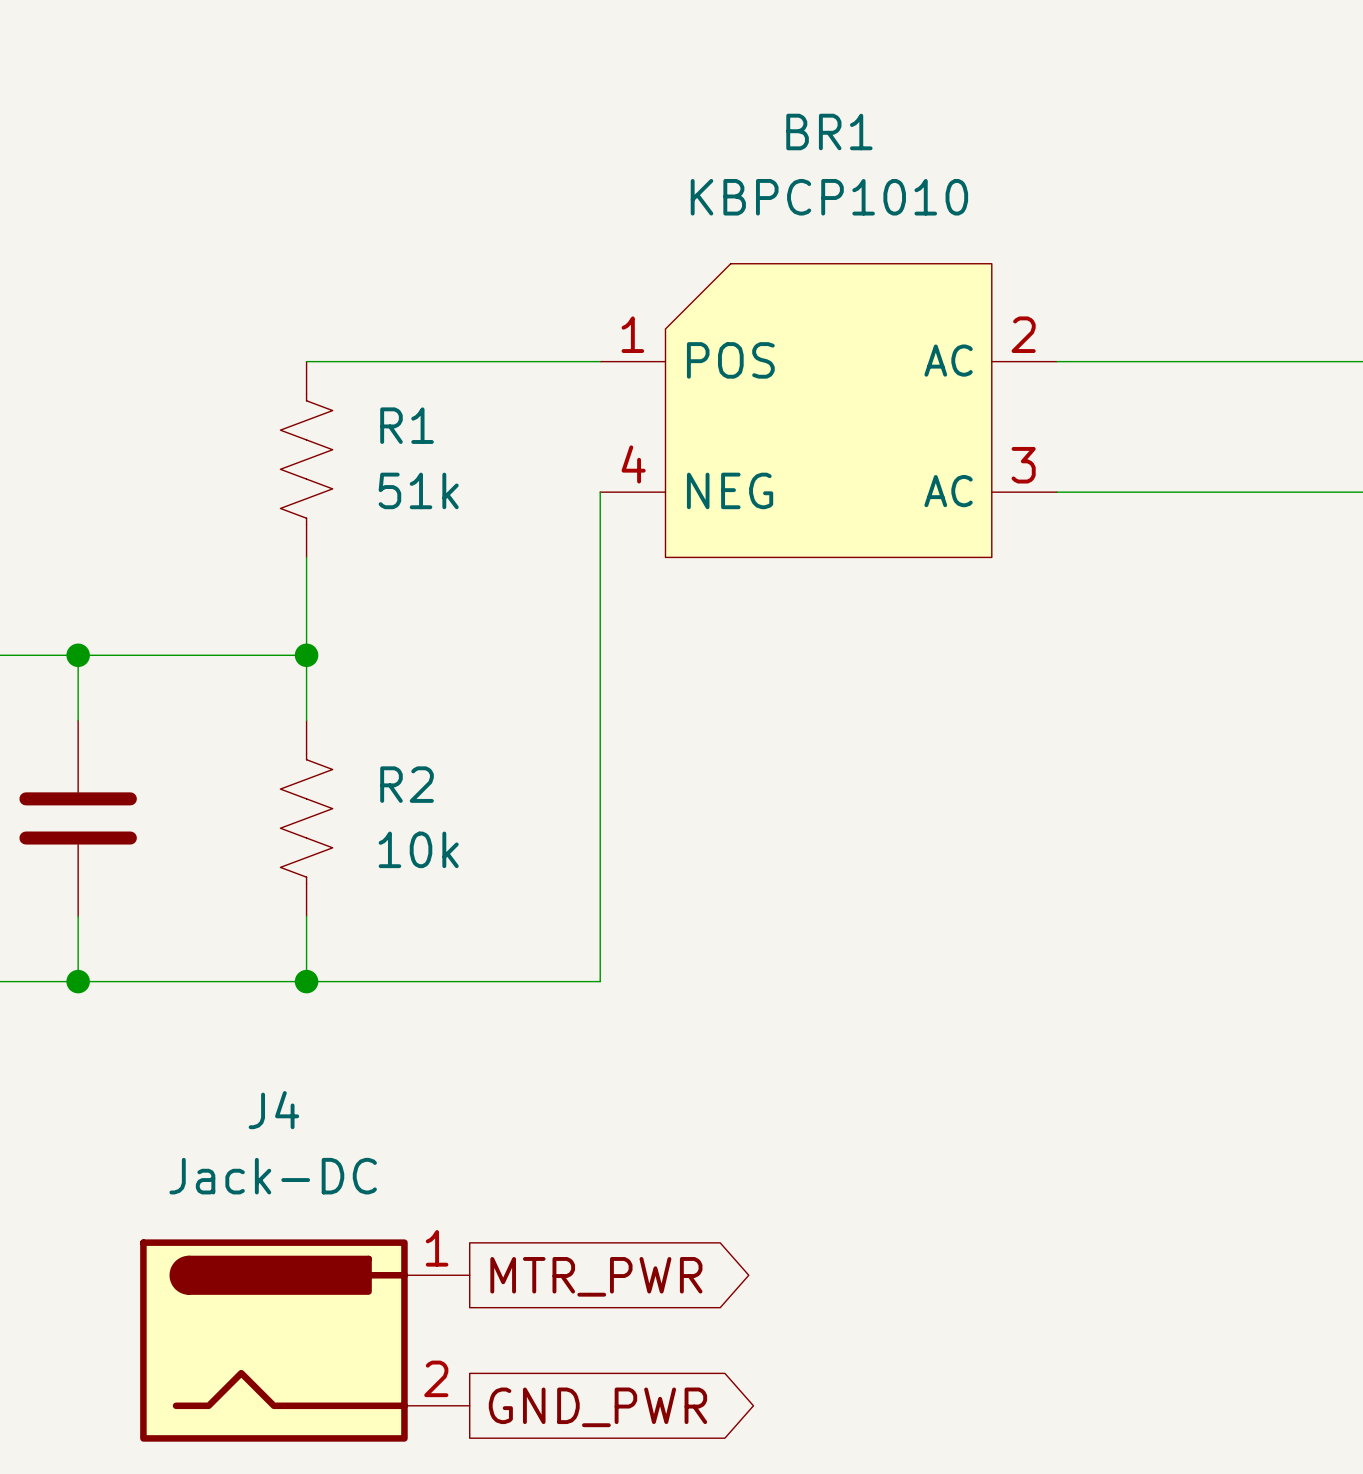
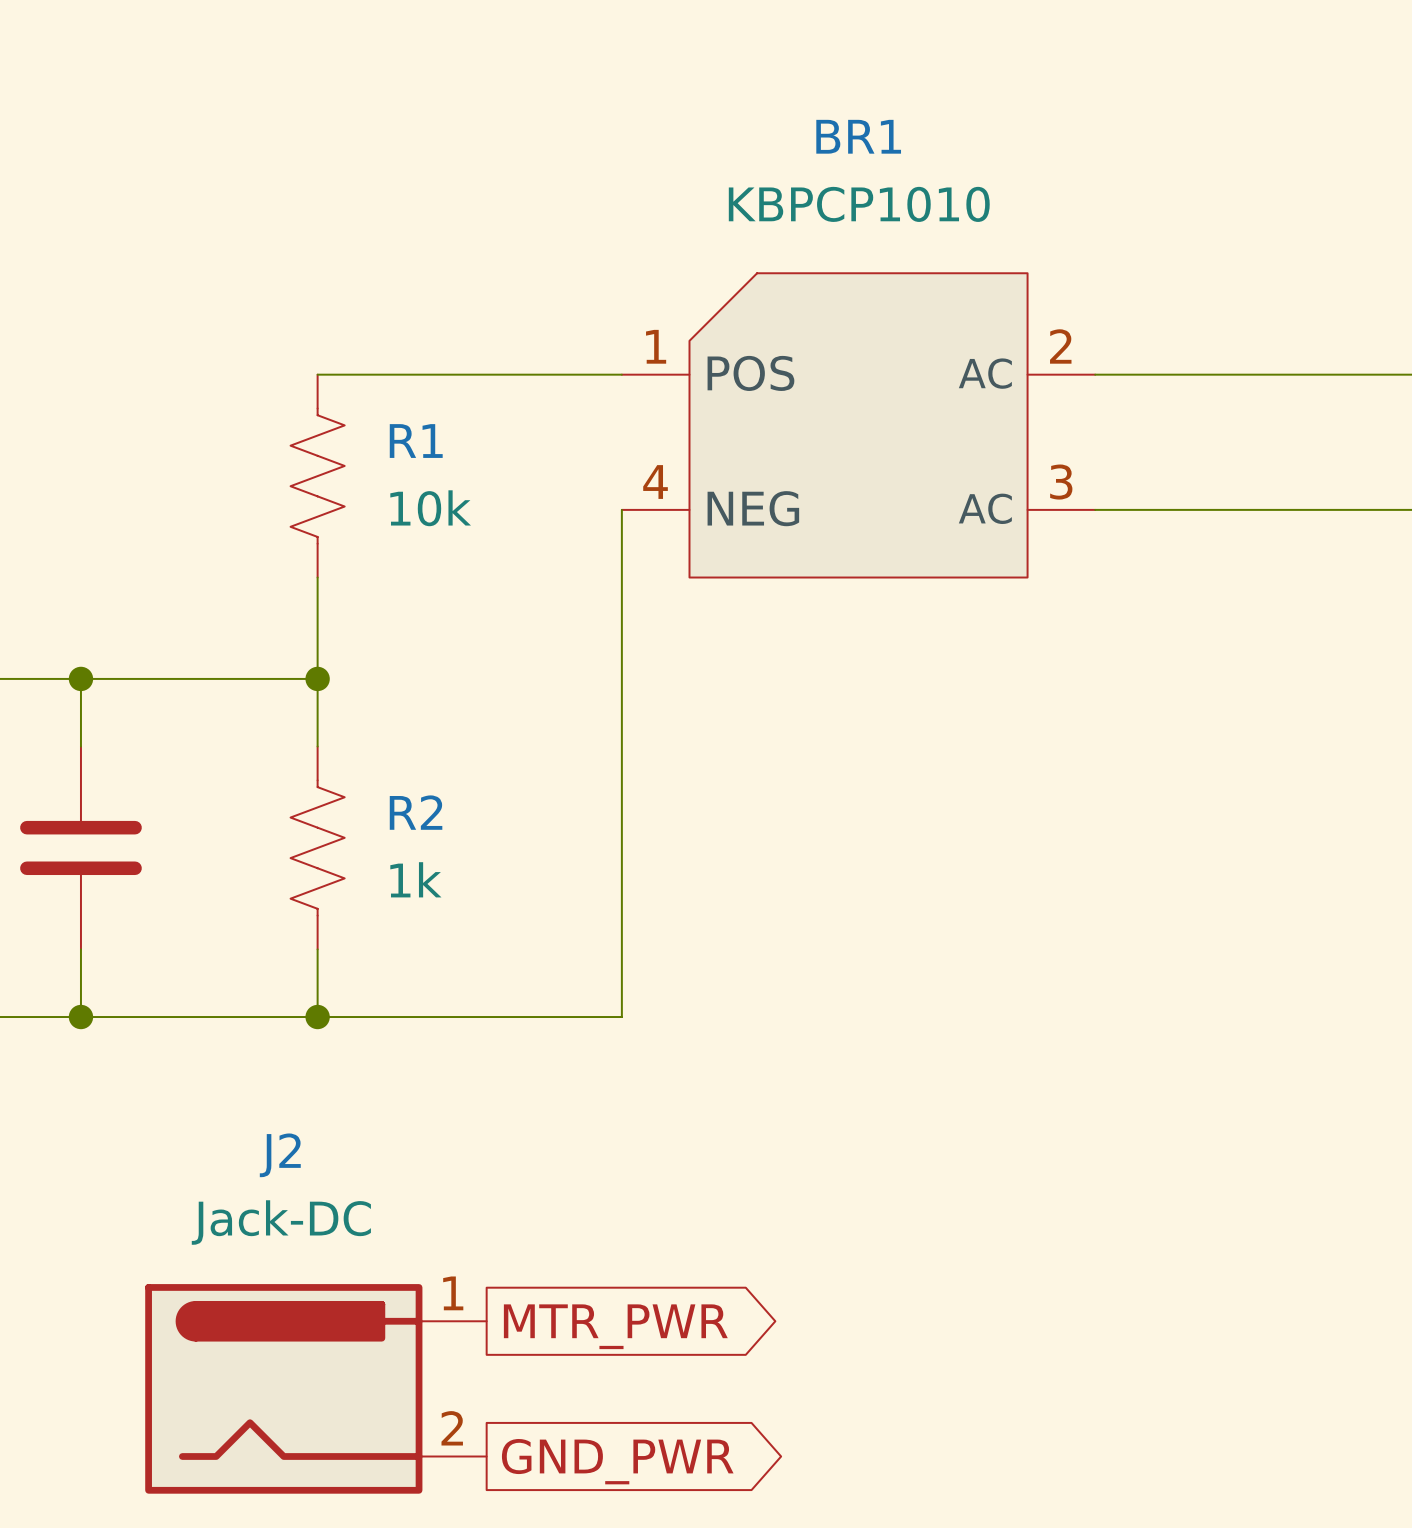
R1 value: 51k (418, 490) -> 10k (430, 508)
R2 value: 10k (418, 849) -> 1k (415, 879)
J4 name: J4 (273, 1110) -> J2 (280, 1155)

